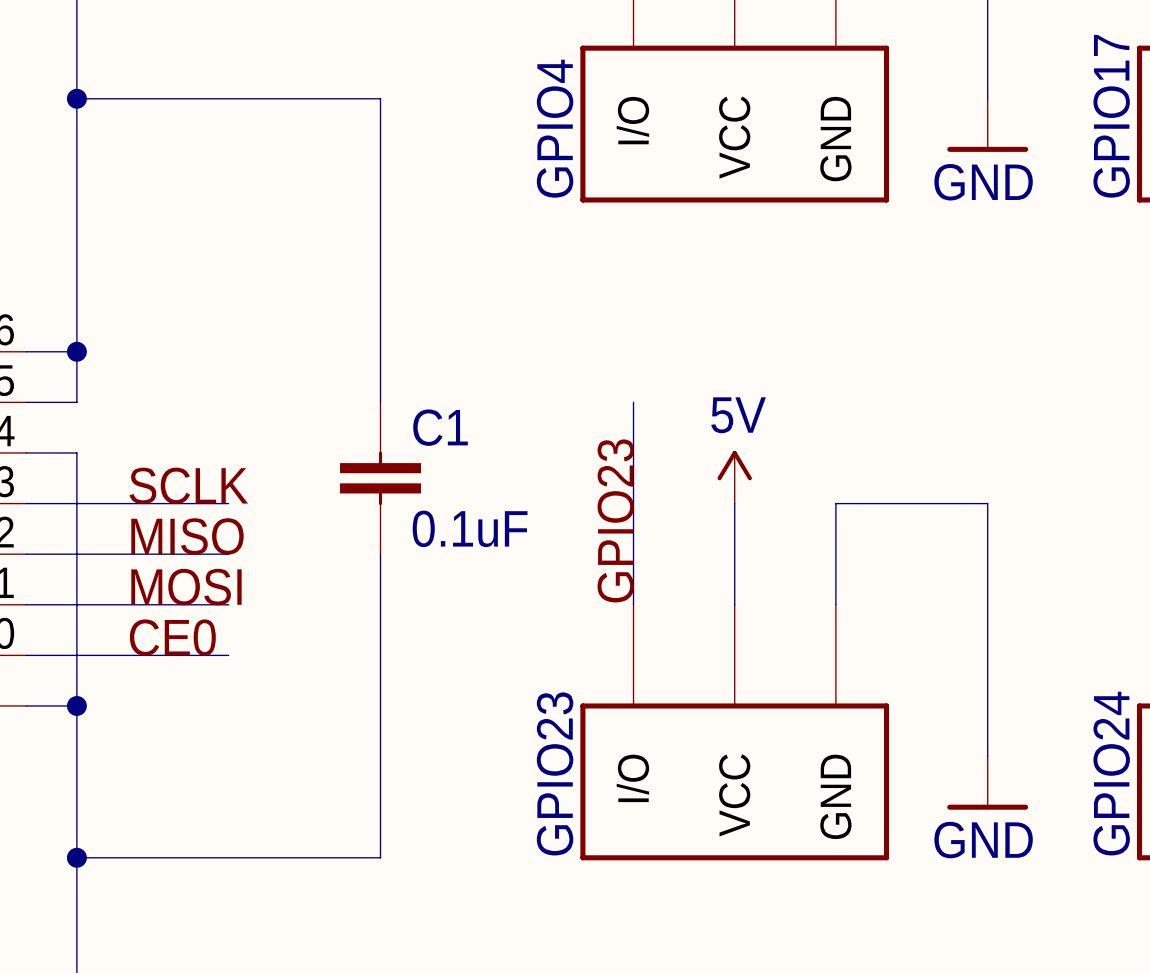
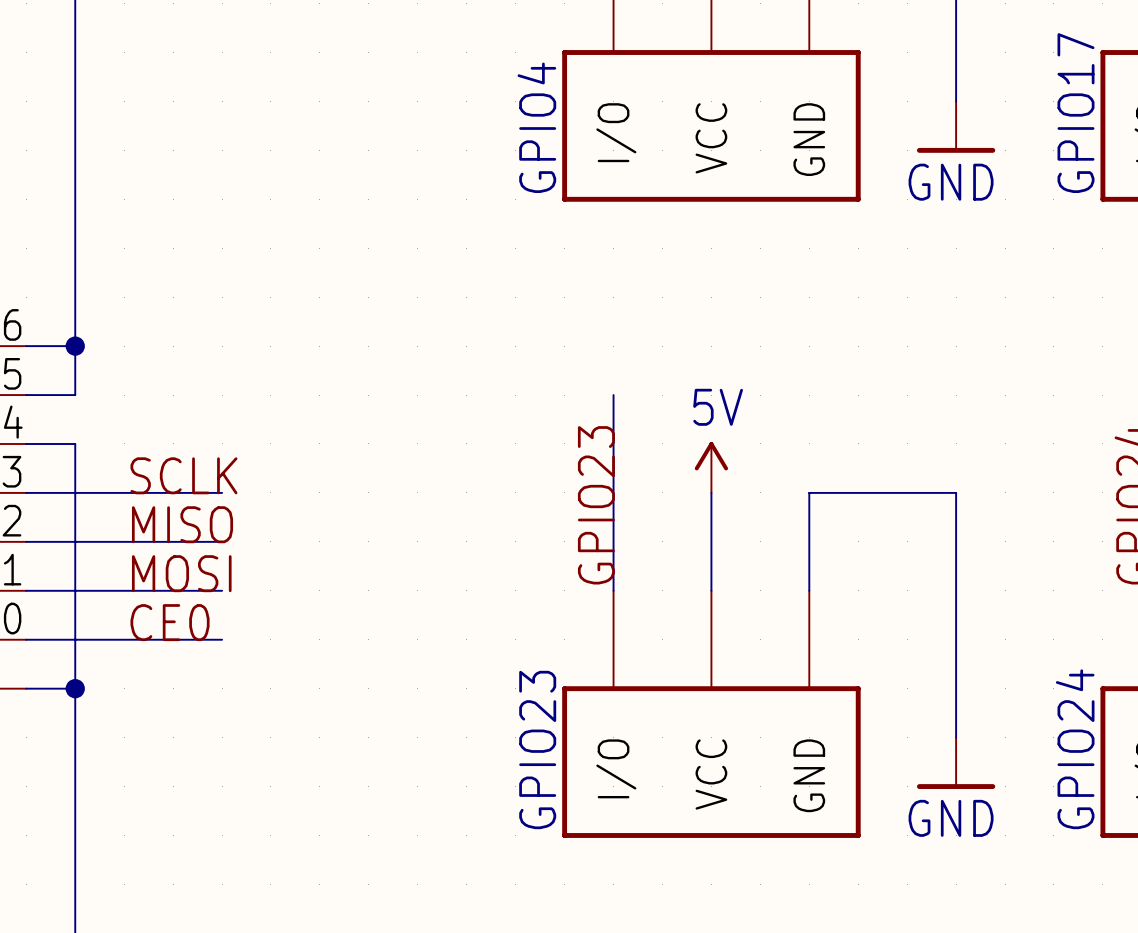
wire: (76, 98) (380, 98) (380, 402) -> none
junction: (76, 98) -> none
C1: 0.1uF (380, 478) -> none
wire: (380, 554) (380, 857) (76, 857) -> none
junction: (76, 857) -> none

